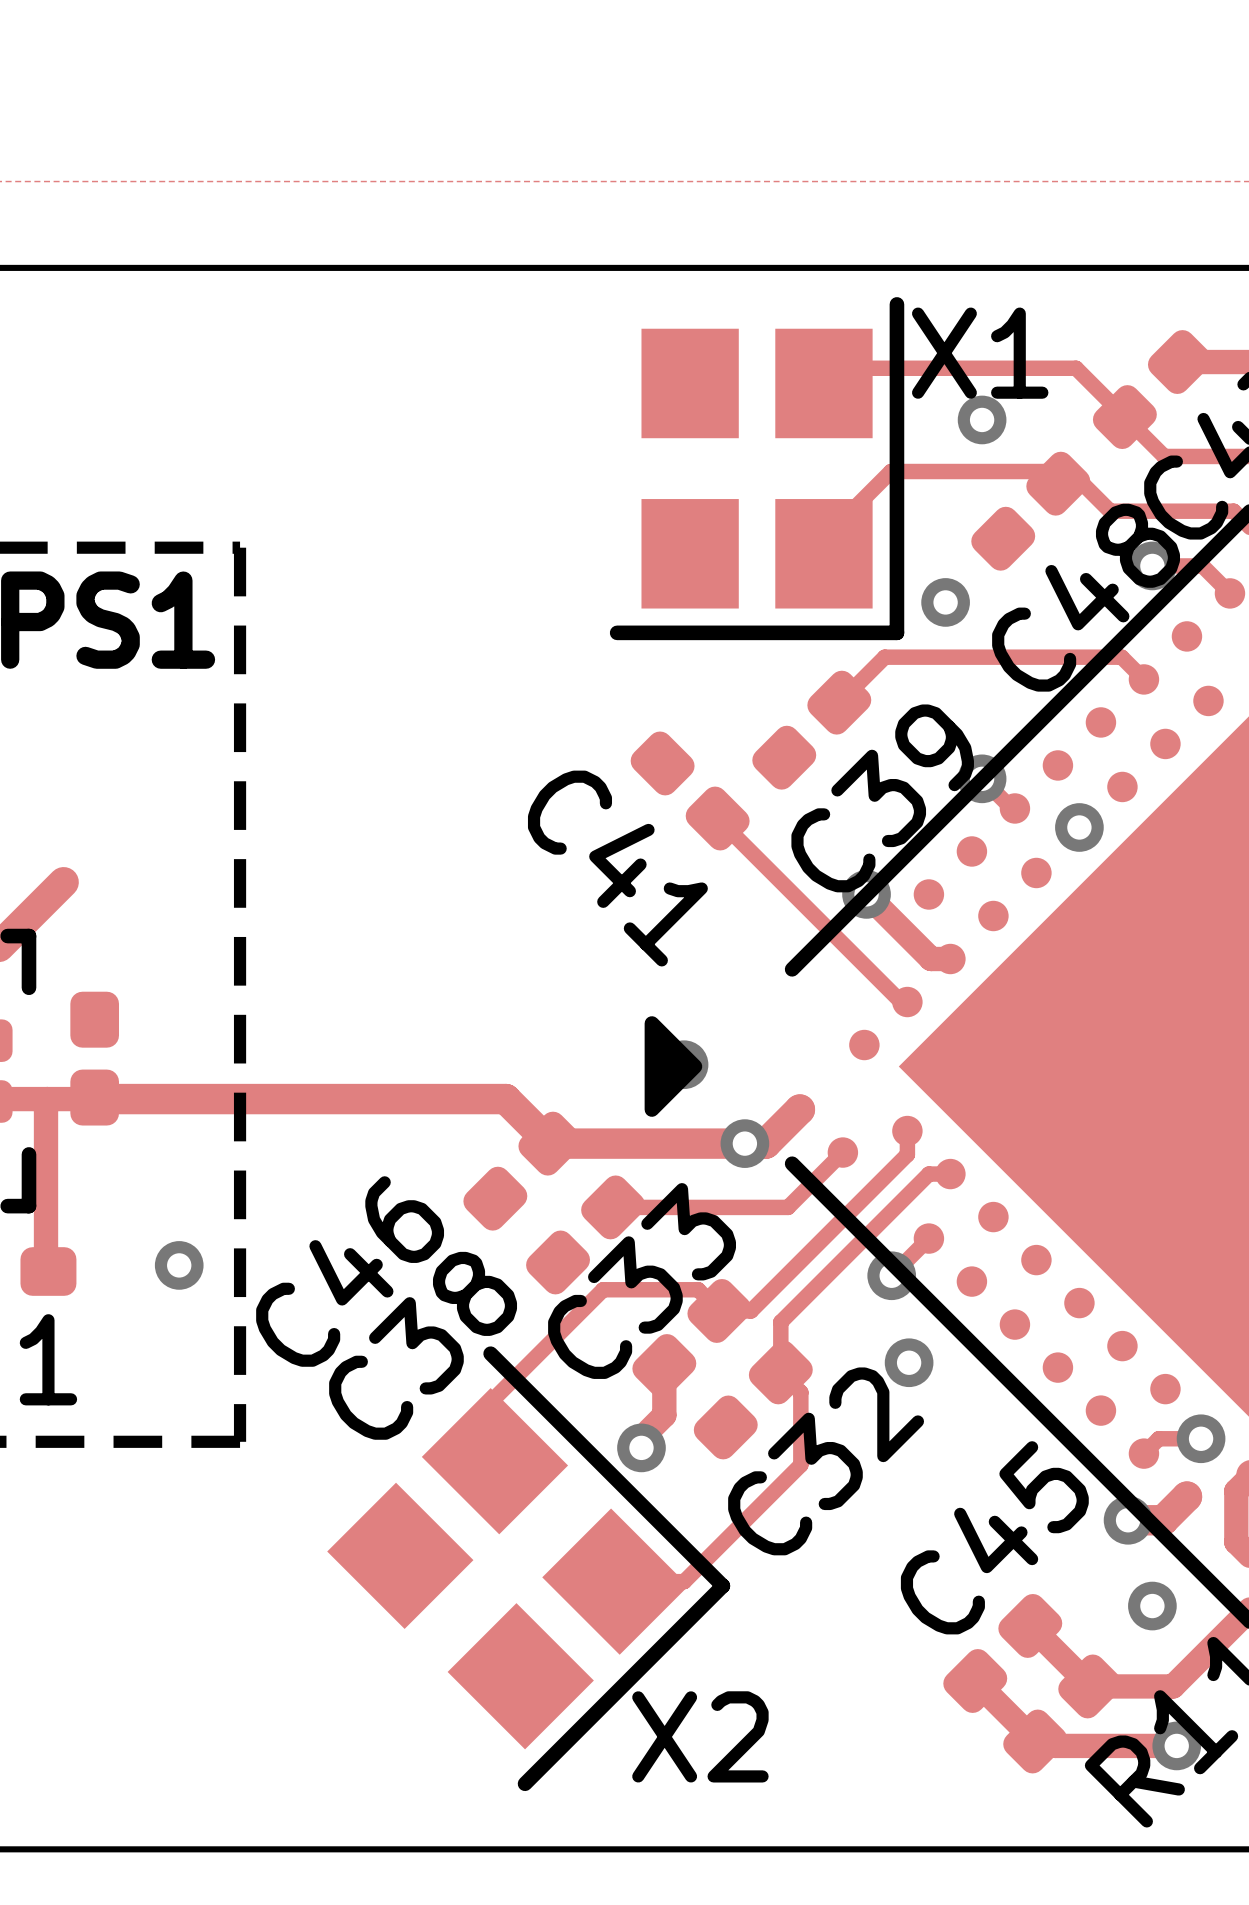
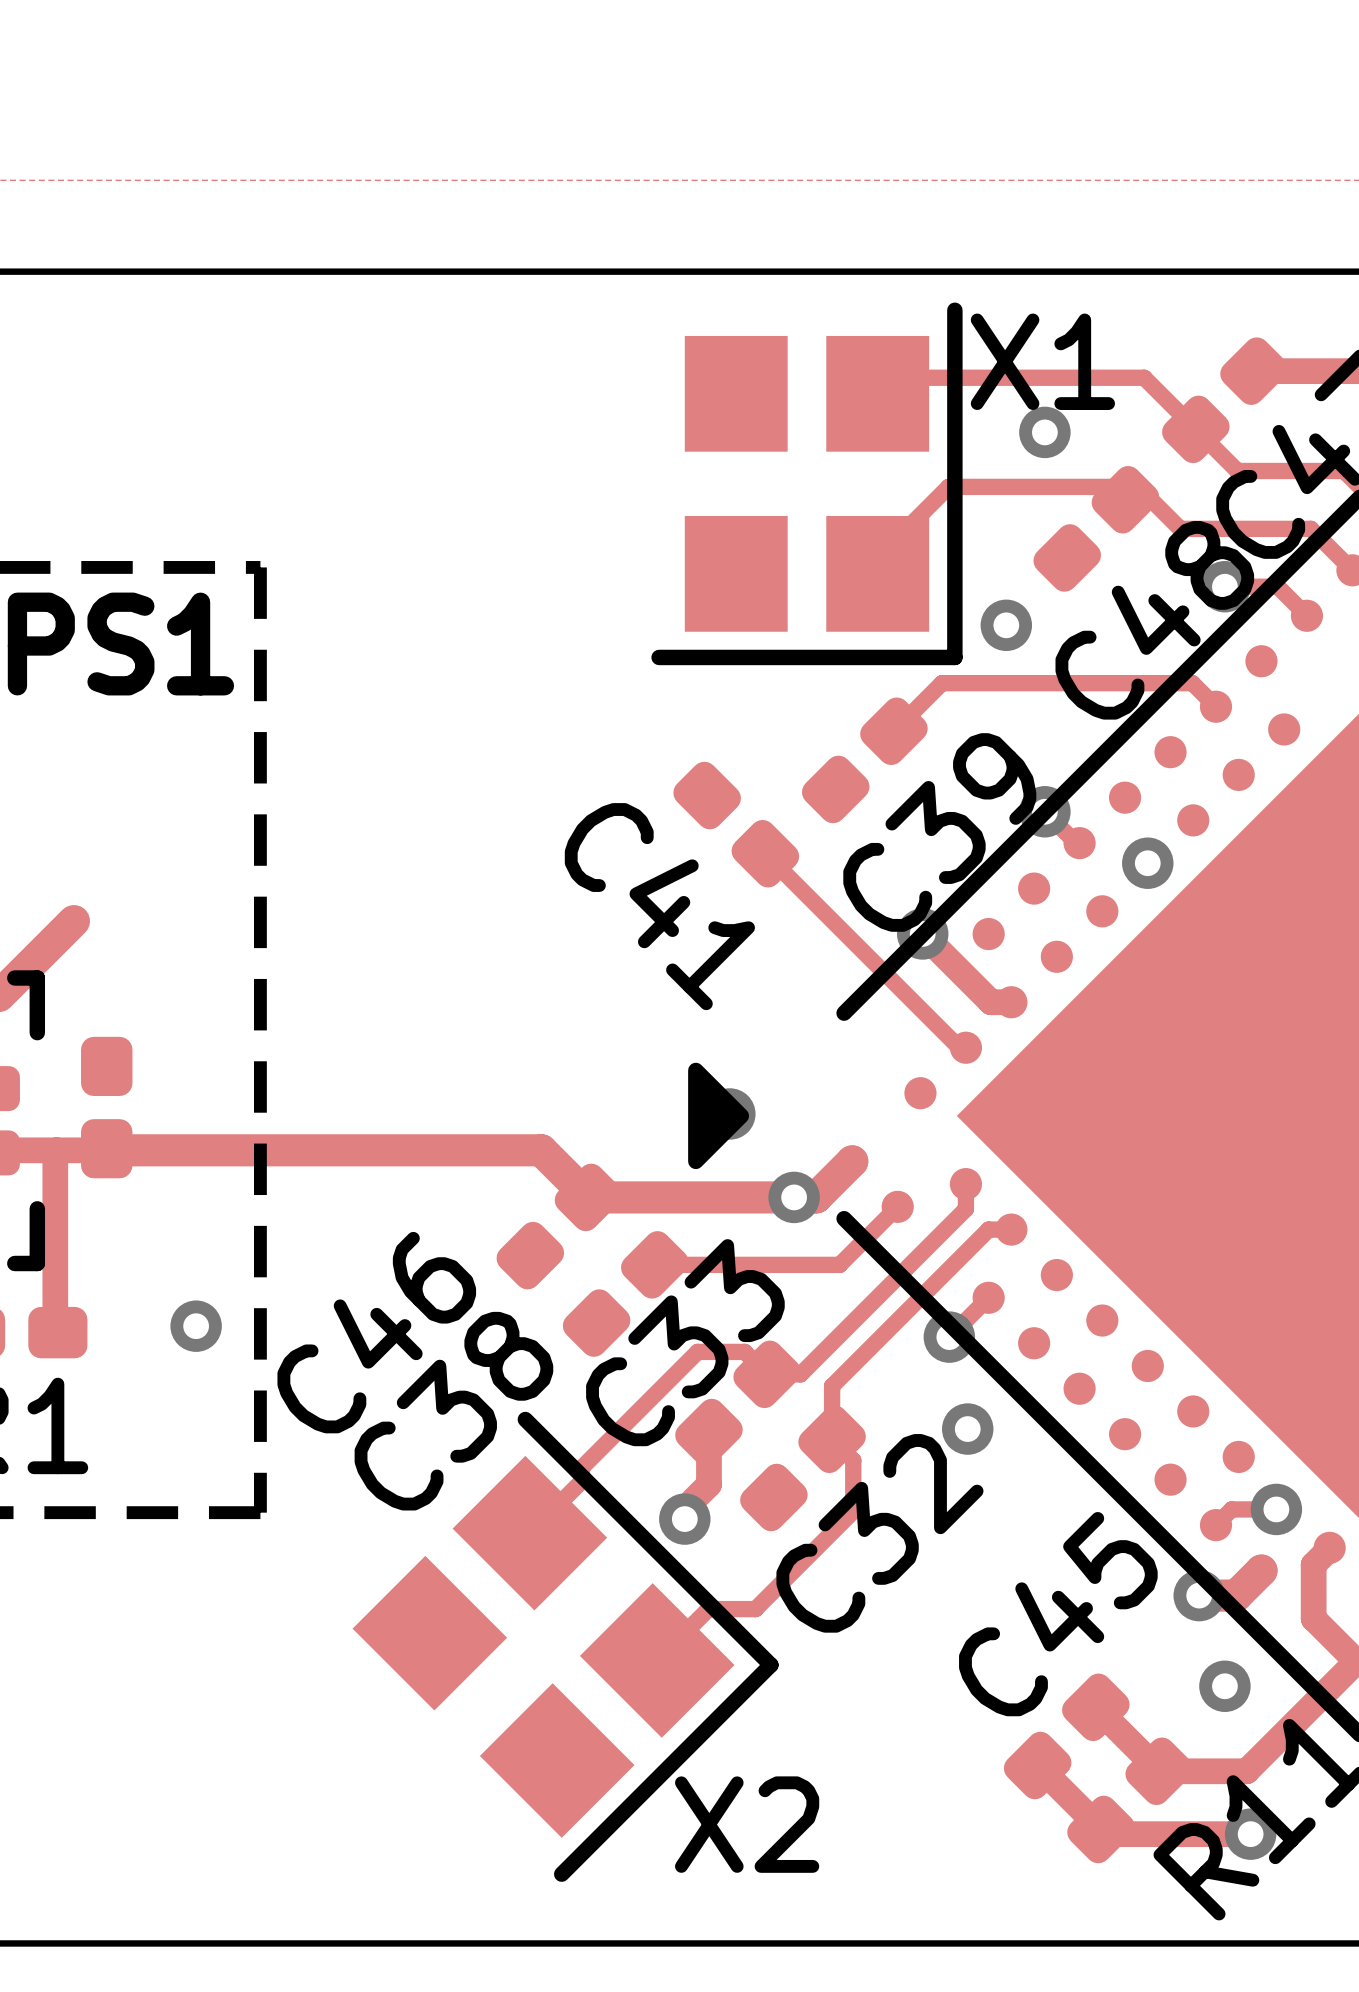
track: (653, 1289) (603, 1289) (494, 1397) (494, 1461) -> (697, 1351) (581, 1467) (581, 1481) (529, 1533)
track: (800, 1440) (800, 1464) (684, 1581) (615, 1581) -> (853, 1511) (755, 1609) (708, 1609) (657, 1660)

